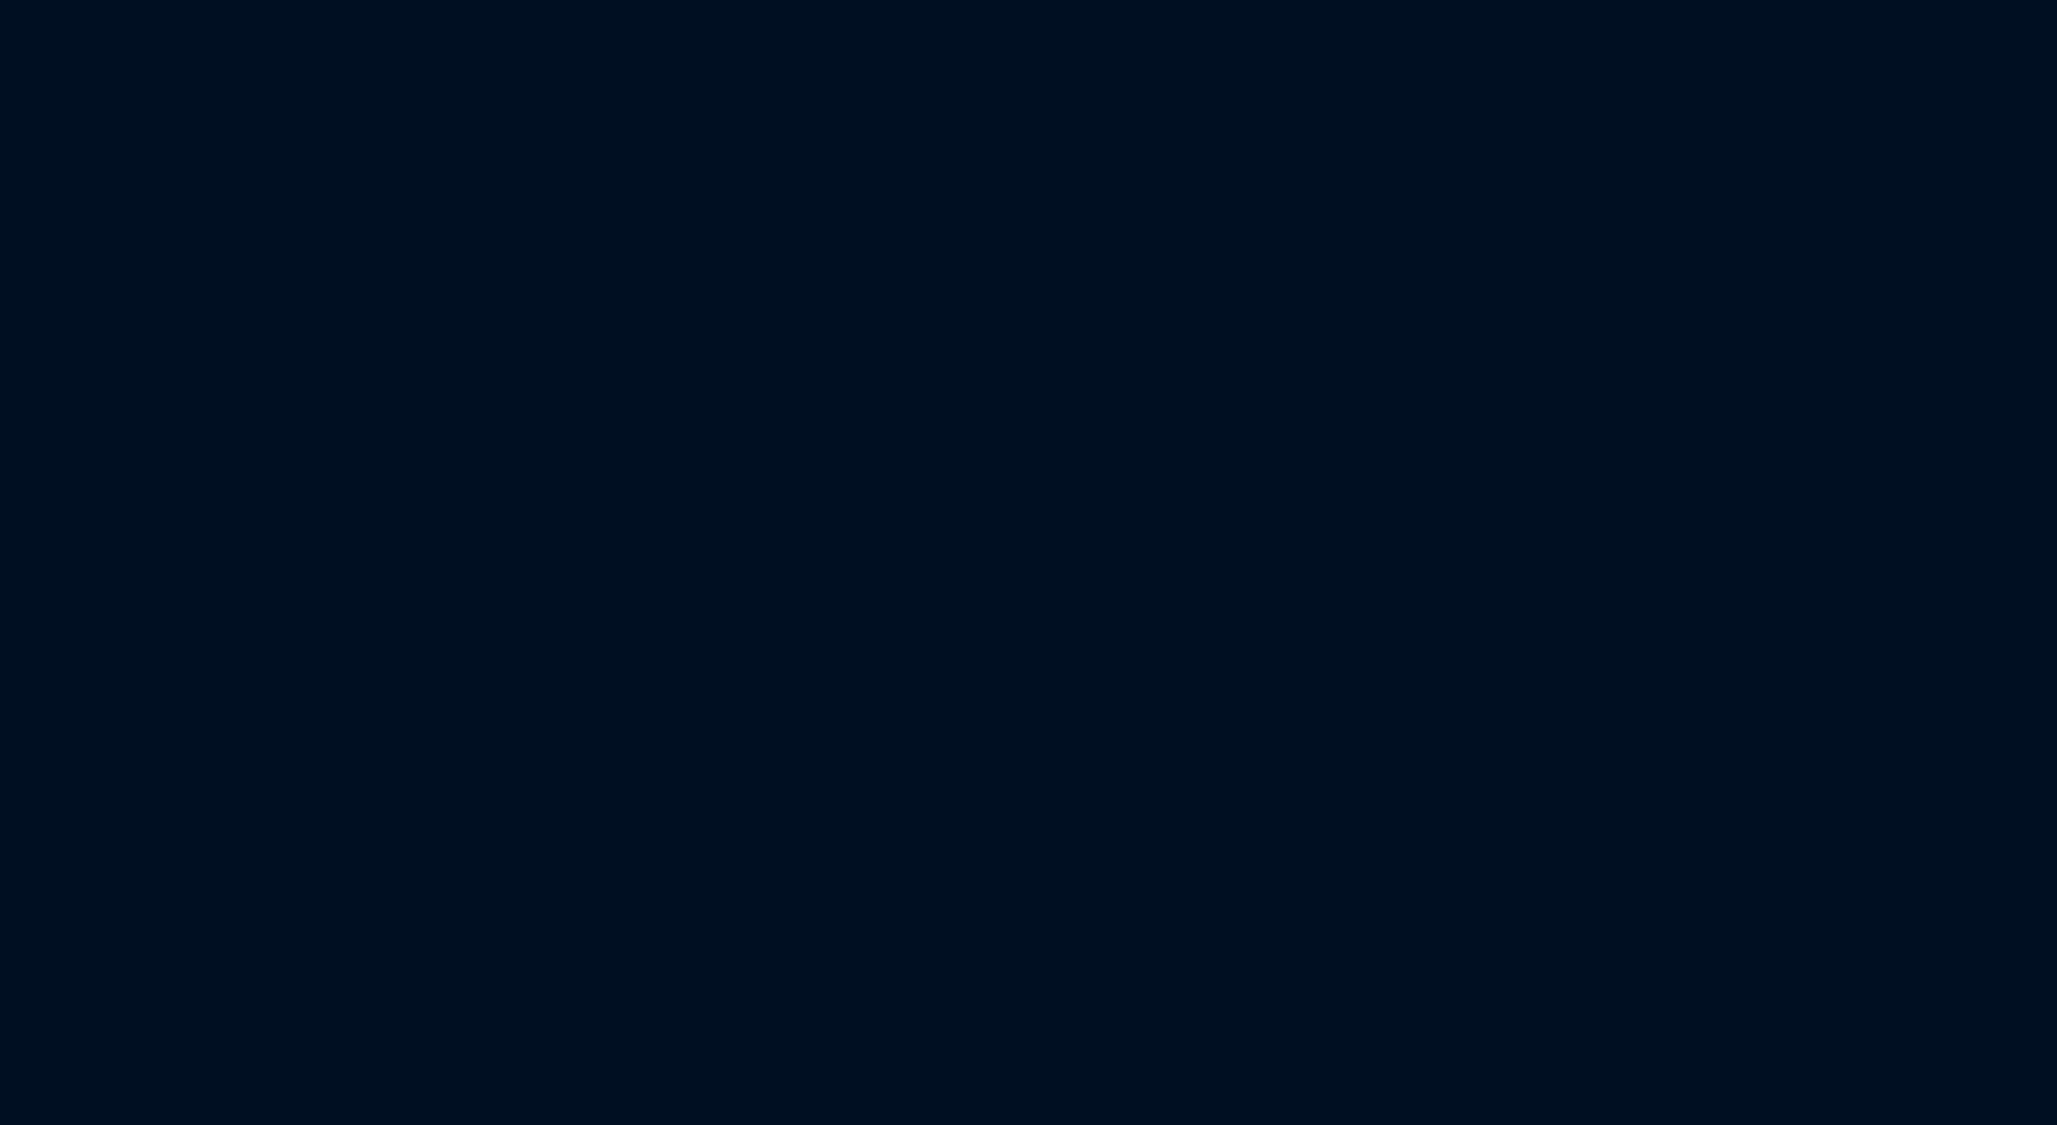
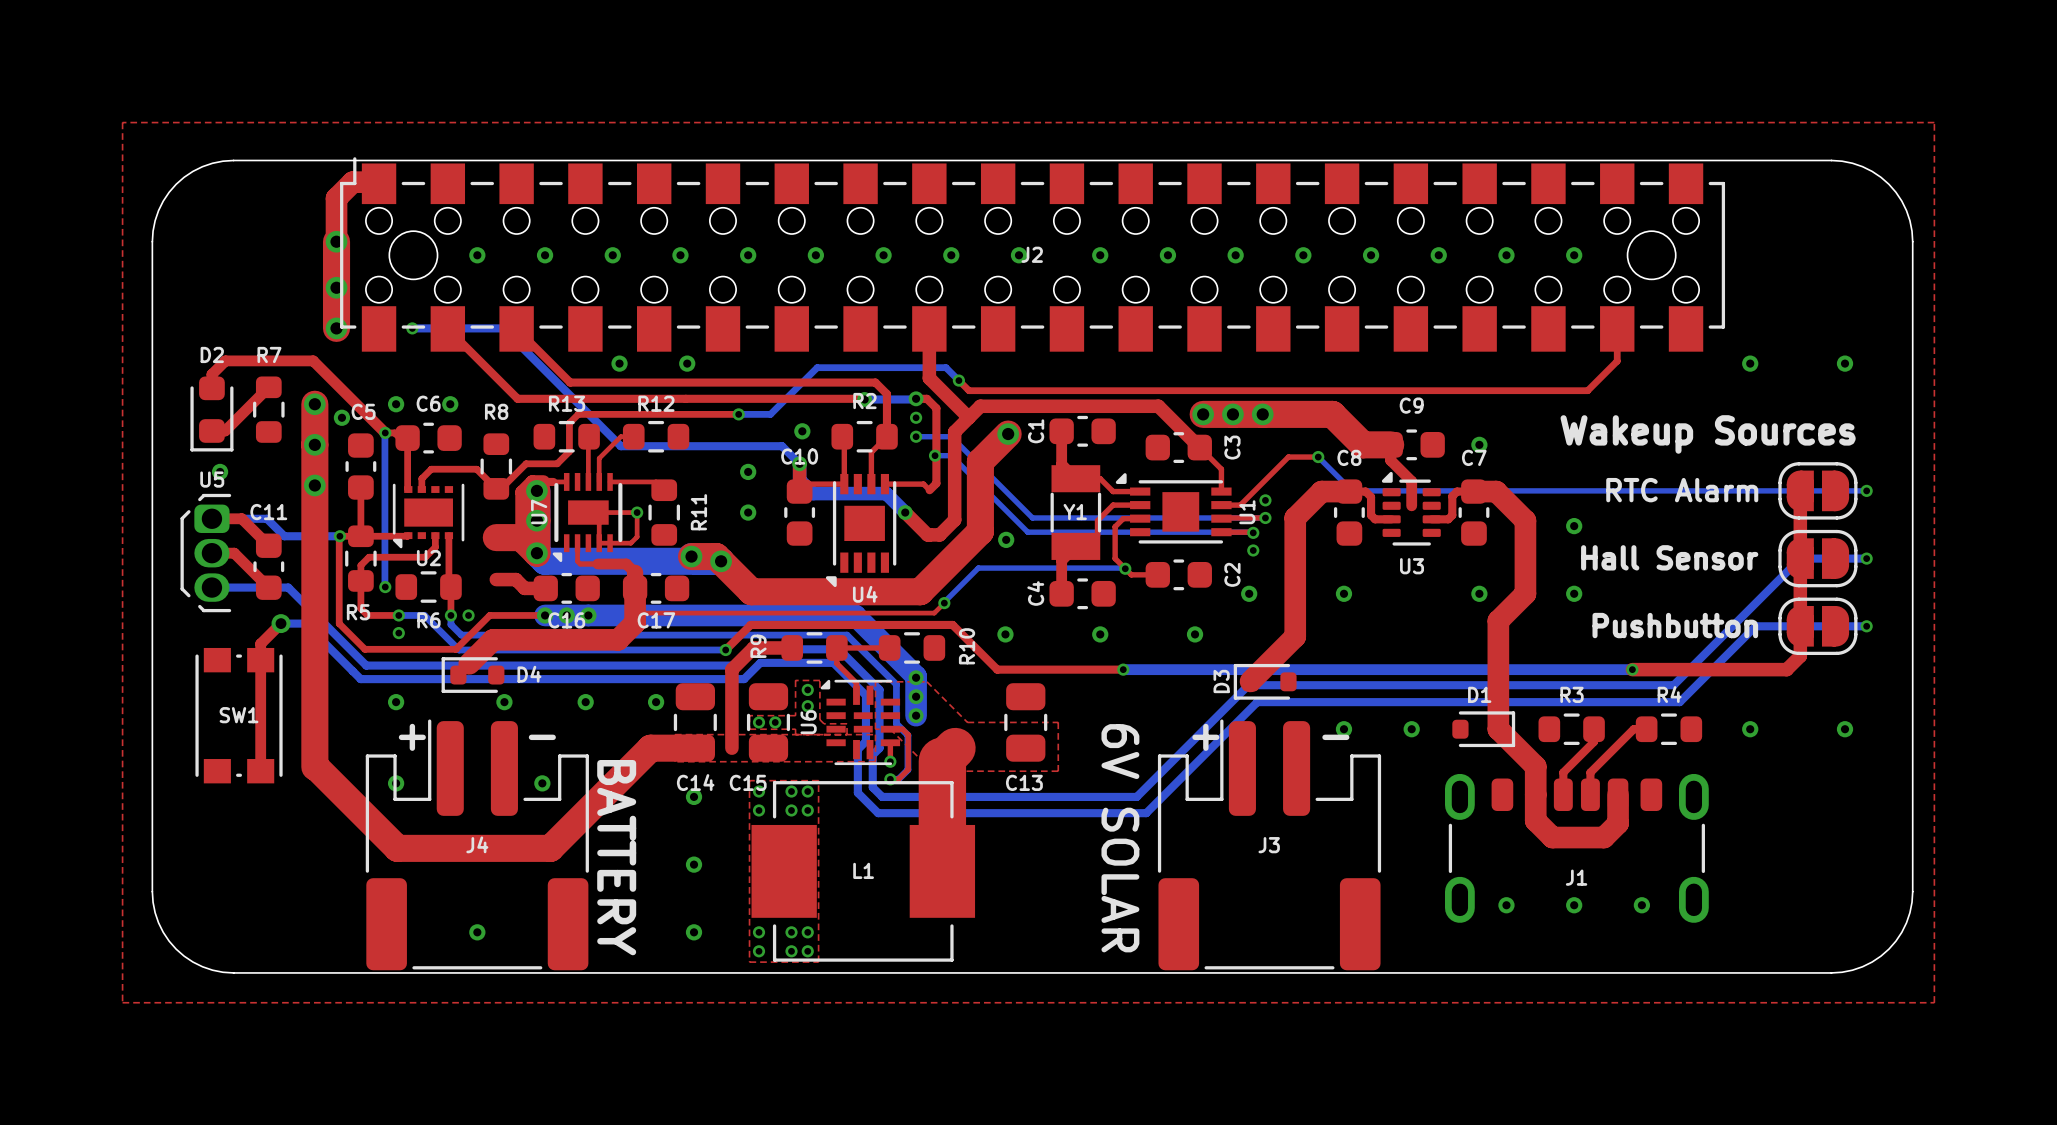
top zone outline: none -> (122, 122) (122, 1002) (1934, 1002) (1934, 122) (122, 122)
board edge: none -> (233, 160) (1831, 160) (1862, 166) (1880, 177) (1895, 192) (1906, 210) (1912, 241) (1912, 891) (1906, 922) (1895, 941) (1880, 956) (1862, 966) (1831, 972) (233, 972) (202, 966) (184, 956) (169, 941) (158, 922) (153, 902) (152, 241) (158, 210) (176, 184) (202, 166) (233, 160)
top track: none -> (379, 182) (352, 182) (336, 198) (336, 328)
via: none -> (336, 241)
J2: none -> (1032, 254)
via: none -> (477, 255)
via: none -> (545, 255)
via: none -> (612, 255)
via: none -> (680, 255)
via: none -> (748, 255)
via: none -> (815, 255)
via: none -> (883, 255)
via: none -> (951, 255)
via: none -> (1018, 255)
via: none -> (1100, 255)
via: none -> (1167, 255)
via: none -> (1235, 255)
via: none -> (1303, 255)
via: none -> (1371, 255)
via: none -> (1438, 255)
via: none -> (1506, 255)
via: none -> (1574, 255)
via: none -> (336, 287)
via: none -> (336, 328)
bottom track: none -> (412, 328) (503, 328) (620, 446) (782, 446) (799, 463) (799, 480) (813, 493) (886, 493) (905, 512)
via: none -> (412, 328)
top track: none -> (447, 328) (517, 398) (864, 399)
top track: none -> (516, 328) (570, 382) (875, 382) (886, 394) (886, 436) (871, 452) (871, 484)
top track: none -> (929, 328) (929, 378) (968, 417)
top track: none -> (1617, 328) (1617, 361) (1587, 390) (969, 390) (958, 380)
via: none -> (619, 363)
via: none -> (687, 363)
via: none -> (1750, 363)
via: none -> (1845, 363)
bottom track: none -> (958, 380) (946, 367) (817, 367) (770, 414) (738, 414)
via: none -> (958, 380)
top track: none -> (268, 387) (225, 430) (211, 430)
top track: none -> (211, 388) (211, 374) (225, 360) (313, 360) (385, 432) (394, 432) (399, 438) (407, 438) (408, 489)
top track: none -> (916, 398) (926, 398) (936, 408) (936, 483) (929, 490) (923, 484) (884, 484)
bottom track: none -> (916, 398) (864, 399)
via: none -> (916, 398)
via: none -> (864, 399)
top track: none -> (314, 404) (314, 767)
via: none -> (314, 404)
via: none -> (396, 404)
via: none -> (450, 404)
R7: none -> (268, 409)
D2: none -> (211, 413)
top track: none -> (738, 414) (578, 414) (569, 423) (569, 451) (557, 463) (526, 463) (501, 488) (496, 488) (476, 469) (431, 469) (421, 478) (421, 489)
via: none -> (738, 414)
top track: none -> (1203, 414) (1332, 414) (1362, 444) (1390, 444) (1390, 460) (1411, 481) (1411, 505)
via: none -> (1203, 414)
via: none -> (1232, 414)
via: none -> (1262, 414)
via: none -> (341, 417)
via: none -> (916, 417)
via: none -> (802, 431)
top track: none -> (1061, 431) (1061, 464) (1075, 478) (1100, 478) (1113, 491) (1140, 491)
C1: none -> (1082, 431)
via: none -> (385, 432)
bottom track: none -> (384, 433) (384, 586)
text: none -> Wakeup Sources (1708, 434)
top track: none -> (1008, 434) (980, 461) (980, 531) (920, 591) (751, 591) (716, 556) (691, 556)
via: none -> (1008, 434)
R13: none -> (566, 436)
top track: none -> (589, 436) (588, 481)
top track: none -> (633, 436) (620, 436) (599, 458) (599, 481)
R12: none -> (656, 436)
top track: none -> (842, 436) (844, 438) (844, 484) (807, 484) (799, 491) (799, 463)
R2: none -> (864, 436)
bottom track: none -> (916, 436) (951, 436) (1032, 517) (1265, 517)
via: none -> (916, 436)
C6: none -> (428, 438)
via: none -> (314, 444)
C9: none -> (1411, 444)
via: none -> (1479, 444)
C3: none -> (1178, 447)
bottom track: none -> (935, 455) (951, 455) (1027, 532) (1253, 532)
via: none -> (935, 455)
top track: none -> (1318, 457) (1288, 457) (1240, 505) (1221, 505)
bottom track: none -> (1318, 457) (1352, 490) (1866, 490)
via: none -> (1318, 457)
via: none -> (799, 463)
C5: none -> (360, 466)
R8: none -> (496, 466)
via: none -> (220, 471)
via: none -> (748, 471)
top track: none -> (566, 481) (532, 481) (522, 492) (522, 528) (513, 537) (496, 537) (521, 537) (536, 553) (536, 490)
top track: none -> (610, 481) (655, 481) (664, 490)
via: none -> (314, 485)
top track: none -> (360, 487) (360, 536)
text: none -> RTC Alarm (1682, 490)
bottom track: none -> (536, 490) (536, 553) (545, 561) (721, 561)
via: none -> (536, 490)
top track: none -> (1800, 490) (1800, 656) (1786, 669) (1632, 669)
part: none -> (1817, 490)
via: none -> (1866, 490)
top track: none -> (1221, 491) (1221, 469) (1158, 406) (980, 406) (954, 431) (954, 520) (939, 534) (927, 534) (905, 512)
via: none -> (1265, 500)
top track: none -> (1140, 505) (1113, 505) (1097, 520) (1097, 535) (1086, 546) (1075, 546) (1061, 560) (1061, 593)
U1: none -> (1173, 508)
U3: none -> (1411, 508)
top track: none -> (588, 512) (637, 512) (637, 536) (630, 543) (599, 543) (599, 523) (588, 512)
via: none -> (637, 512)
R11: none -> (664, 512)
via: none -> (748, 512)
C10: none -> (799, 512)
via: none -> (905, 512)
Y1: none -> (1075, 512)
C8: none -> (1349, 512)
C7: none -> (1473, 512)
U2: none -> (428, 515)
U7: none -> (587, 517)
top track: none -> (1265, 517) (1221, 518)
via: none -> (1265, 517)
top track: none -> (211, 518) (241, 518) (268, 545)
bottom track: none -> (211, 518) (266, 518) (284, 536) (339, 536)
top track: none -> (1140, 518) (1123, 518) (1115, 526) (1115, 558) (1131, 574) (1157, 574)
top track: none -> (1391, 519) (1375, 519) (1371, 515) (1371, 496) (1365, 491) (1321, 491) (1295, 517) (1295, 636) (1250, 681)
top track: none -> (1431, 519) (1448, 519) (1452, 515) (1452, 496) (1457, 491) (1496, 491) (1525, 520) (1525, 593) (1498, 620) (1498, 729) (1535, 766) (1535, 820) (1552, 837) (1603, 837) (1618, 823) (1618, 794)
via: none -> (536, 520)
via: none -> (1574, 526)
U4: none -> (861, 530)
top track: none -> (1221, 532) (1253, 532)
via: none -> (1253, 532)
top track: none -> (408, 535) (339, 536) (339, 623) (364, 649) (455, 649) (489, 615) (545, 615)
top track: none -> (435, 535) (435, 547) (425, 557) (369, 557) (360, 565) (360, 608) (367, 615) (398, 615)
top track: none -> (448, 535) (450, 615)
via: none -> (339, 536)
via: none -> (1006, 539)
top track: none -> (577, 543) (577, 561) (580, 564) (626, 564) (635, 572) (635, 622)
via: none -> (1253, 550)
U5: none -> (205, 553)
top track: none -> (211, 553) (234, 553) (268, 587)
via: none -> (536, 553)
via: none -> (691, 556)
text: none -> Hall Sensor (1669, 557)
R5: none -> (360, 558)
part: none -> (1817, 558)
bottom track: none -> (1866, 558) (1800, 558) (1673, 685) (1248, 685) (1136, 796) (882, 796) (872, 787) (872, 754) (879, 748) (879, 689) (839, 649) (750, 649) (734, 665) (366, 665) (288, 587) (211, 587)
via: none -> (1866, 558)
via: none -> (721, 561)
C11: none -> (268, 566)
bottom track: none -> (1125, 568) (978, 568) (944, 603)
via: none -> (1125, 568)
C2: none -> (1178, 574)
top track: none -> (496, 579) (515, 579) (524, 588) (545, 588)
via: none -> (385, 587)
R6: none -> (428, 587)
C16: none -> (566, 588)
C17: none -> (656, 588)
C4: none -> (1082, 593)
via: none -> (1249, 593)
via: none -> (1343, 593)
via: none -> (1479, 593)
via: none -> (1574, 593)
top track: none -> (944, 603) (934, 613) (644, 613) (635, 622)
via: none -> (944, 603)
bottom track: none -> (398, 615) (424, 615) (459, 650) (725, 650)
via: none -> (398, 615)
bottom track: none -> (450, 615) (450, 624) (461, 635) (847, 635) (896, 684) (896, 723) (907, 735) (907, 769) (898, 779) (890, 779)
via: none -> (450, 615)
via: none -> (468, 615)
bottom track: none -> (545, 615) (855, 615) (916, 676) (916, 715)
via: none -> (545, 615)
via: none -> (566, 615)
via: none -> (588, 615)
top track: none -> (635, 622) (618, 639) (493, 639) (469, 663)
top track: none -> (281, 623) (260, 643) (260, 771)
bottom track: none -> (281, 623) (305, 623) (360, 679) (744, 679) (760, 662) (833, 662) (865, 695) (865, 741) (857, 749) (857, 792) (878, 813) (1146, 813) (1257, 702) (1679, 702) (1755, 626) (1866, 626)
via: none -> (281, 623)
text: none -> Pushbutton (1675, 625)
part: none -> (1817, 626)
via: none -> (1866, 626)
via: none -> (398, 633)
via: none -> (1005, 634)
via: none -> (1100, 634)
via: none -> (1195, 634)
top track: none -> (792, 647) (753, 647) (731, 669) (731, 748)
R9: none -> (814, 647)
top track: none -> (889, 647) (836, 647) (836, 663) (856, 683) (856, 695)
R10: none -> (912, 647)
top track: none -> (725, 650) (750, 624) (952, 624) (997, 669) (1123, 669)
via: none -> (725, 650)
bottom track: none -> (1123, 669) (1632, 669)
via: none -> (1123, 669)
via: none -> (1632, 669)
D4: none -> (473, 675)
via: none -> (916, 677)
top zone outline: none -> (875, 681) (875, 729) (890, 729) (932, 771) (1058, 771) (1058, 722) (967, 722) (926, 681) (875, 681)
D3: none -> (1265, 681)
via: none -> (807, 689)
via: none -> (916, 696)
via: none -> (396, 702)
via: none -> (504, 702)
via: none -> (585, 702)
via: none -> (656, 702)
via: none -> (807, 706)
SW1: none -> (239, 715)
via: none -> (916, 715)
C14: none -> (695, 722)
via: none -> (759, 722)
C15: none -> (768, 722)
via: none -> (775, 722)
U6: none -> (860, 722)
C13: none -> (1025, 722)
line: none -> (412, 726) (412, 748)
line: none -> (1205, 726) (1205, 748)
top track: none -> (890, 729) (902, 729) (908, 734) (908, 769) (898, 779) (890, 779)
via: none -> (1343, 729)
via: none -> (1411, 729)
D1: none -> (1483, 729)
R3: none -> (1571, 729)
top track: none -> (1594, 729) (1594, 741) (1563, 772) (1563, 794)
top track: none -> (1646, 729) (1633, 729) (1590, 772) (1590, 794)
R4: none -> (1668, 729)
via: none -> (1750, 729)
via: none -> (1845, 729)
top zone outline: none -> (675, 734) (875, 734) (875, 761) (675, 761) (675, 734)
top zone outline: none -> (795, 734) (795, 729) (749, 729) (749, 715) (795, 715) (795, 680) (819, 680) (819, 719) (824, 723) (847, 723) (847, 734)
line: none -> (401, 737) (423, 737)
line: none -> (531, 737) (553, 737)
line: none -> (1195, 737) (1216, 737)
line: none -> (1325, 737) (1346, 737)
top track: none -> (890, 742) (890, 761)
top track: none -> (695, 748) (650, 748) (550, 848) (397, 848) (316, 767)
top track: none -> (955, 748) (942, 761) (942, 871)
via: none -> (890, 761)
via: none -> (890, 779)
top zone outline: none -> (749, 780) (749, 962) (818, 962) (818, 780) (749, 780)
via: none -> (396, 783)
via: none -> (542, 783)
via: none -> (759, 791)
via: none -> (791, 791)
via: none -> (807, 791)
via: none -> (694, 796)
via: none -> (759, 810)
via: none -> (791, 810)
via: none -> (807, 810)
text: none -> 6V SOLAR (1120, 838)
J4: none -> (477, 844)
J3: none -> (1269, 844)
text: none -> BATTERY (616, 857)
J1: none -> (1576, 848)
via: none -> (694, 864)
L1: none -> (863, 871)
via: none -> (1506, 905)
via: none -> (1574, 905)
via: none -> (1641, 905)
via: none -> (477, 932)
via: none -> (694, 932)
via: none -> (759, 932)
via: none -> (791, 932)
via: none -> (807, 932)
via: none -> (759, 951)
via: none -> (791, 951)
via: none -> (807, 951)

